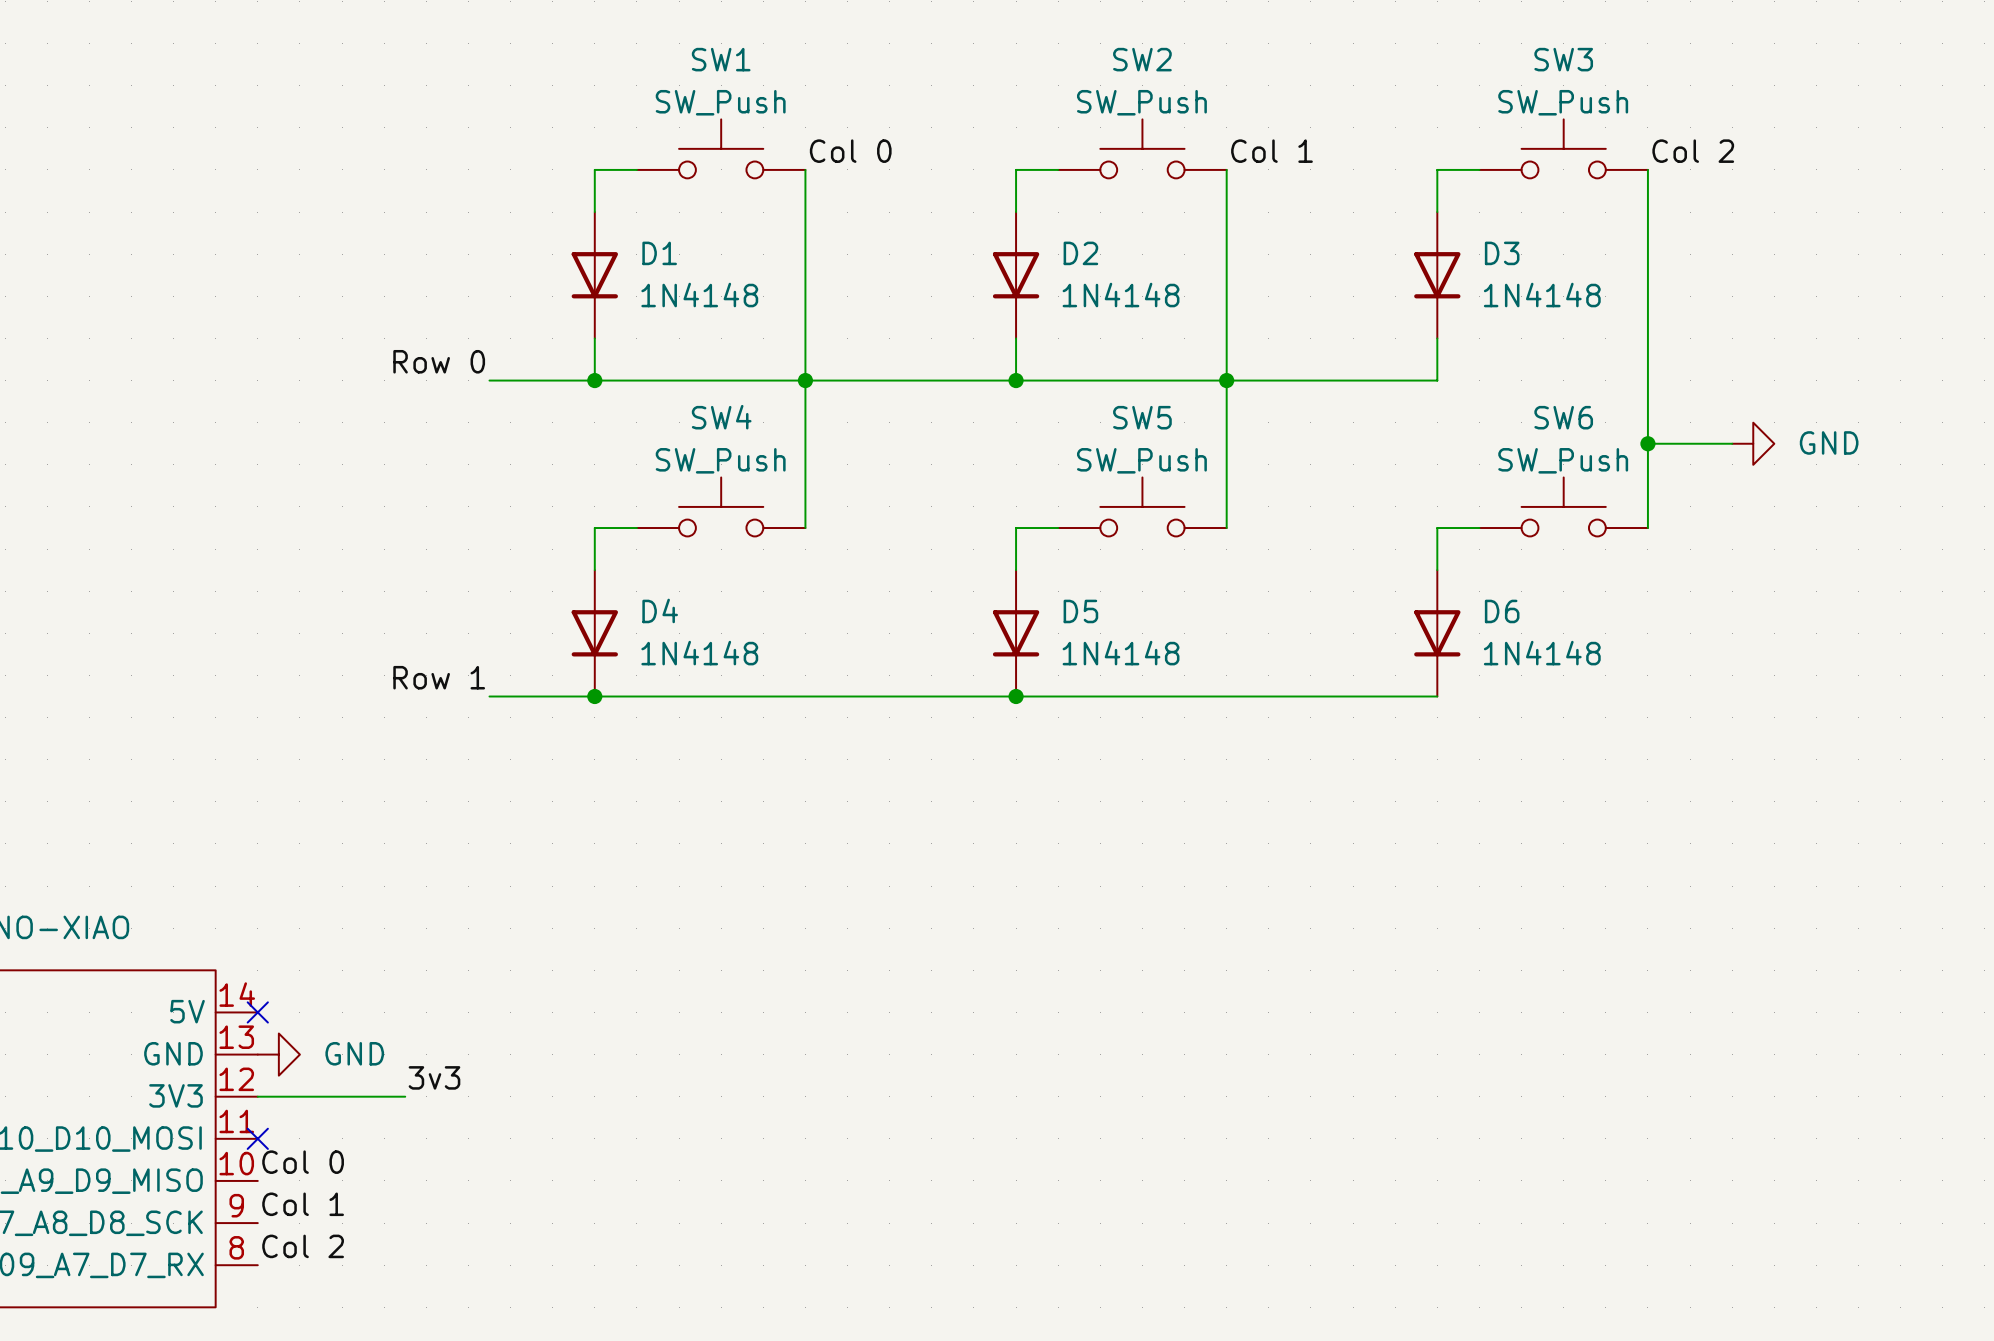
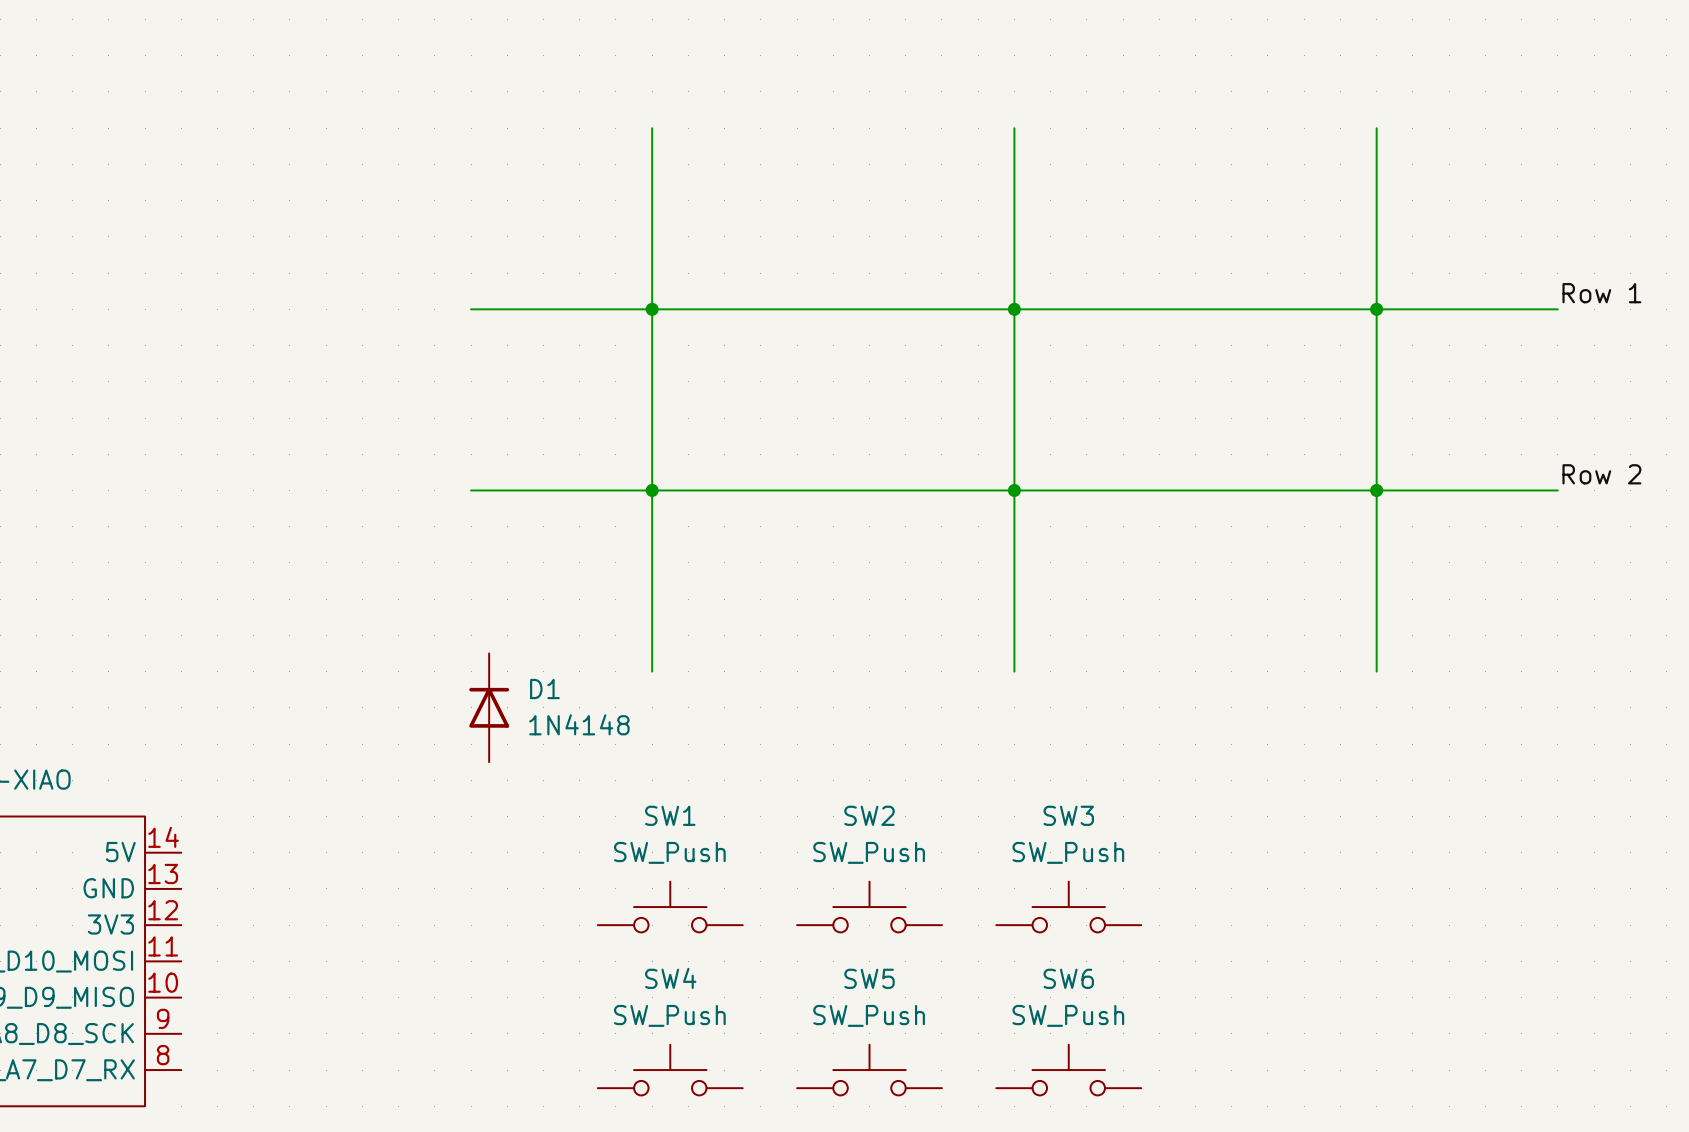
SW1 name position: SW1 (721, 59) -> SW1 (670, 815)
SW2 name position: SW2 (1142, 59) -> SW2 (869, 815)
SW3 name position: SW3 (1563, 59) -> SW3 (1068, 815)
SW1 value position: SW_Push (720, 102) -> SW_Push (669, 852)
SW2 value position: SW_Push (1141, 102) -> SW_Push (869, 852)
SW3 value position: SW_Push (1563, 102) -> SW_Push (1068, 852)
SW1 position: (721, 148) -> (670, 907)
SW2 position: (1142, 148) -> (869, 907)
SW3 position: (1563, 148) -> (1068, 907)
label: Col 0 (850, 151) -> none
label: Col 1 (1271, 151) -> none
label: Col 2 (1693, 151) -> none
wire: (636, 169) (594, 169) (594, 212) -> none
wire: (1058, 169) (1016, 169) (1016, 212) -> none
wire: (1479, 169) (1437, 169) (1437, 212) -> none
D1 rotation: 0° (594, 275) -> 180° (489, 707)
D1 position: (594, 275) -> (489, 707)
D2: 1N4148 (1016, 275) -> none
D3: 1N4148 (1437, 275) -> none
wire: (594, 338) (594, 380) (489, 380) -> none
wire: (1016, 338) (1016, 380) -> none
wire: (1437, 338) (1437, 380) -> (1557, 309) (1195, 309)
label: Row 0 (439, 361) -> none
label: none -> Row 1 (1601, 293)
junction: (594, 380) -> none
junction: (1016, 380) -> none
SW4 name position: SW4 (721, 417) -> SW4 (670, 978)
SW5 name position: SW5 (1142, 417) -> SW5 (869, 978)
SW6 name position: SW6 (1563, 417) -> SW6 (1068, 978)
wire: (1647, 443) (1732, 443) -> none
junction position: (1647, 443) -> (1376, 309)
power symbol: GND (1753, 443) -> none
SW4 value position: SW_Push (720, 460) -> SW_Push (669, 1015)
SW5 value position: SW_Push (1141, 460) -> SW_Push (869, 1015)
SW6 value position: SW_Push (1563, 460) -> SW_Push (1068, 1015)
SW4 position: (721, 506) -> (670, 1070)
SW5 position: (1142, 506) -> (869, 1070)
SW6 position: (1563, 506) -> (1068, 1070)
wire: (636, 528) (594, 528) (594, 570) -> none
wire: none -> (652, 436) (652, 671)
wire: (1058, 528) (1016, 528) (1016, 570) -> none
wire: none -> (1014, 436) (1014, 671)
wire: (1479, 528) (1437, 528) (1437, 570) -> none
wire: none -> (1376, 436) (1376, 671)
label: none -> Row 2 (1601, 474)
wire: none -> (471, 490) (1557, 490)
junction: none -> (652, 490)
junction: none -> (1014, 490)
junction: none -> (1376, 490)
D4: 1N4148 (594, 633) -> none
D5: 1N4148 (1016, 633) -> none
D6: 1N4148 (1437, 633) -> none
label: Row 1 (439, 677) -> none
wire: (489, 696) (1437, 696) -> none
junction: (594, 696) -> none
junction: (1016, 696) -> none
no-connect mark: (257, 1012) -> none
power symbol: GND (278, 1054) -> none
label: 3v3 (434, 1077) -> none
wire: (257, 1096) (405, 1096) -> none
no-connect mark: (257, 1138) -> none
label: Col 0 (303, 1162) -> none
label: Col 1 (303, 1204) -> none
label: Col 2 (303, 1246) -> none

